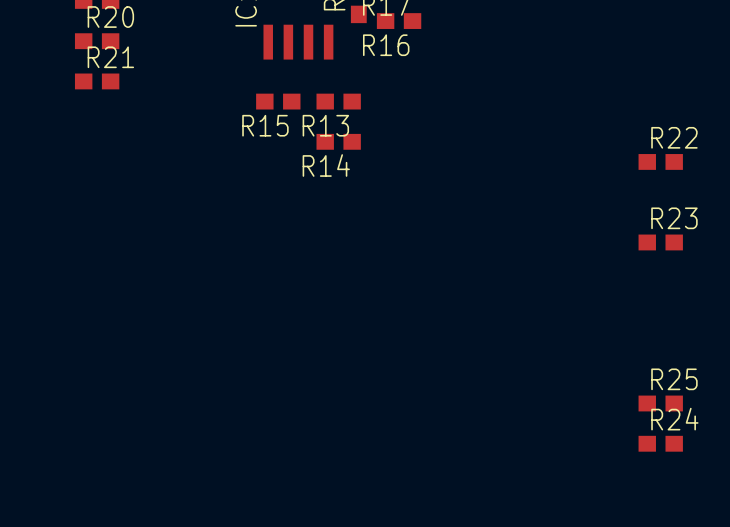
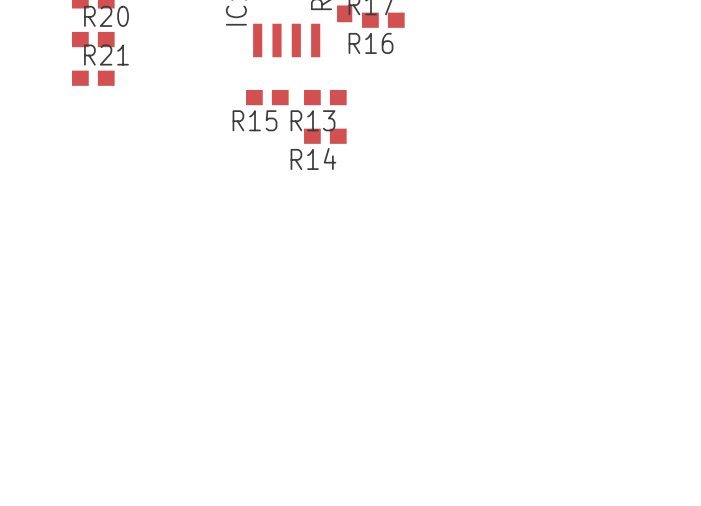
R22: (660, 161) -> none
R23: (660, 242) -> none
R25: (660, 403) -> none
R24: (660, 443) -> none

